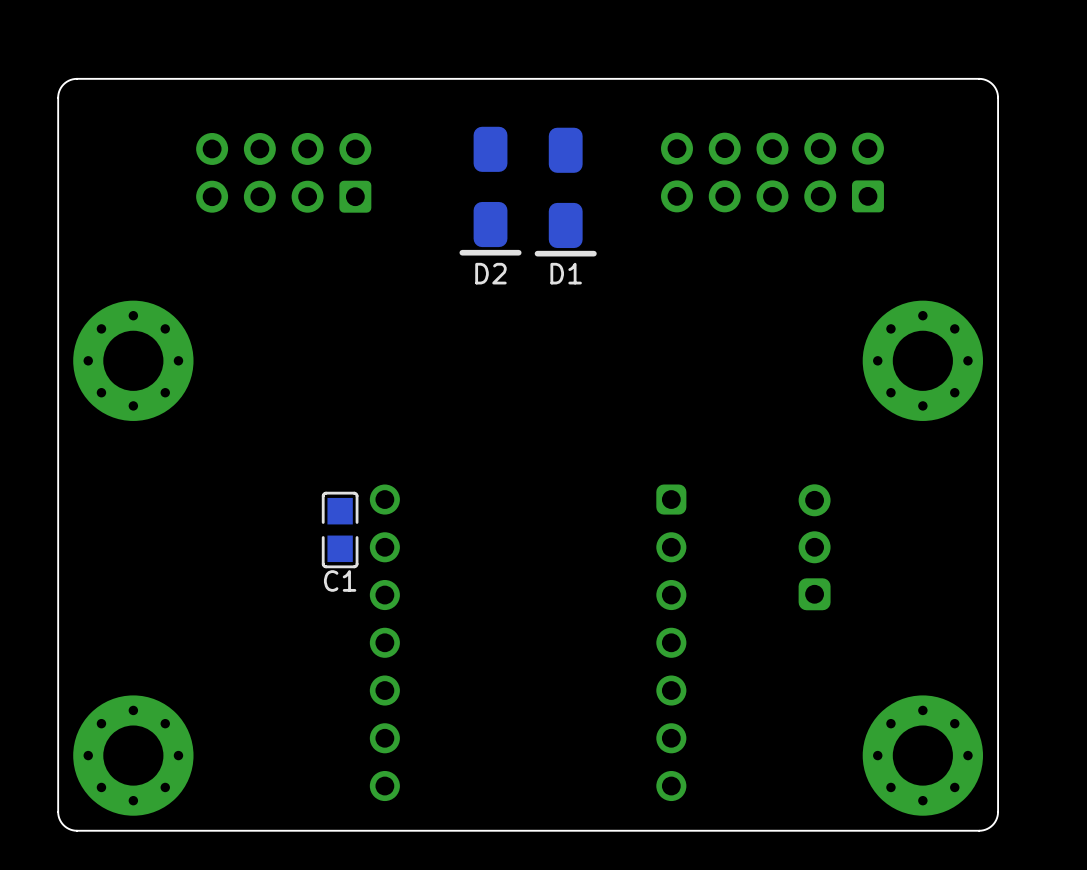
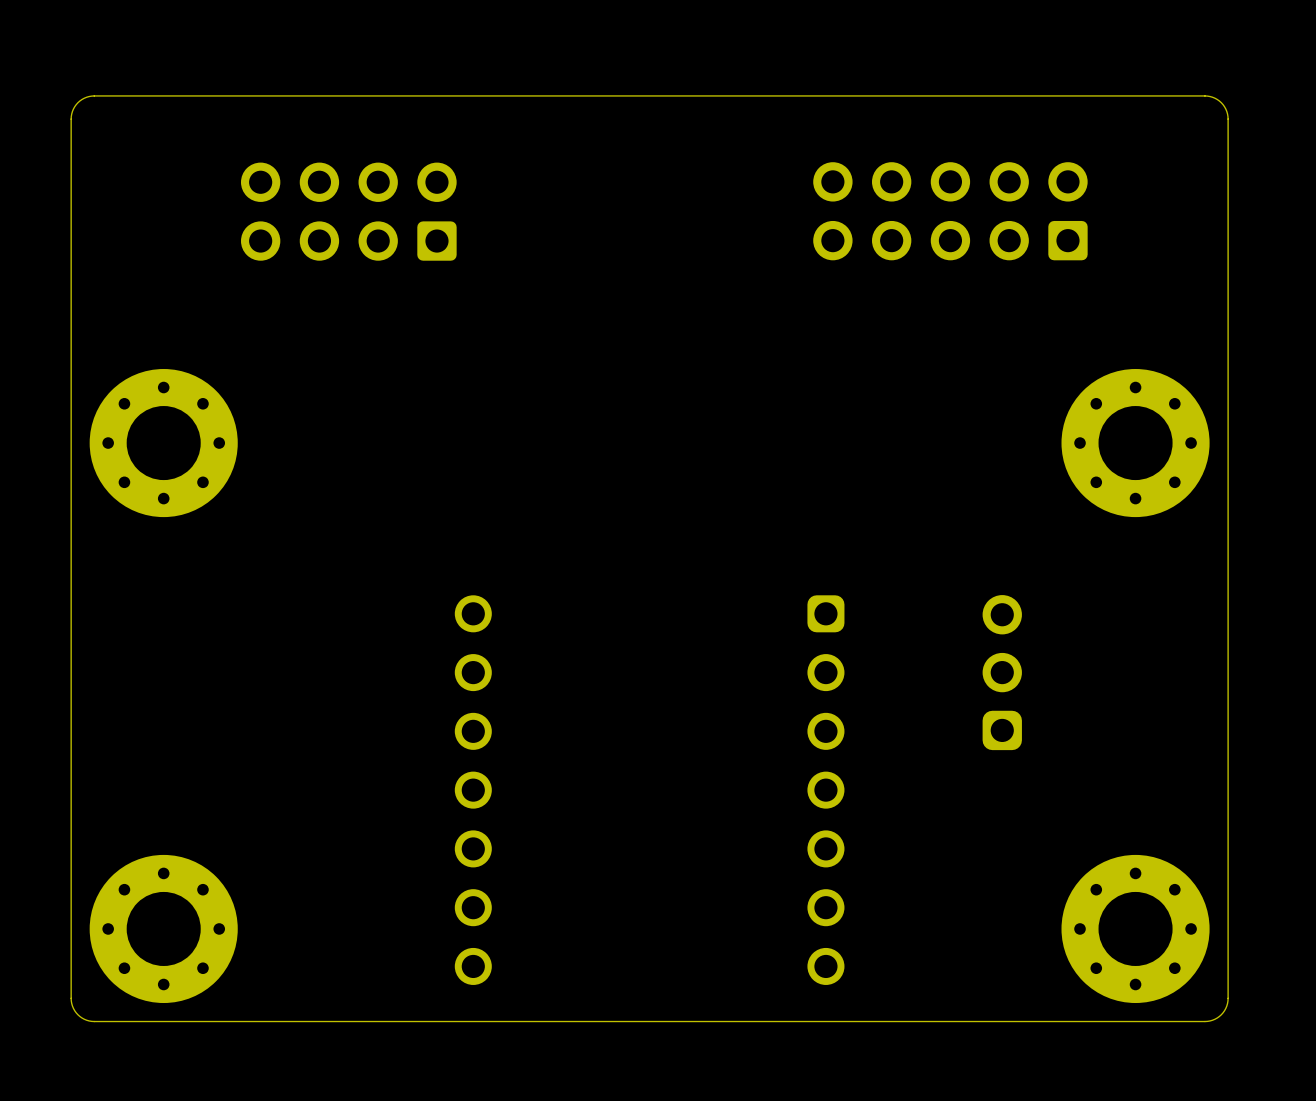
D2: (490, 191) -> none
D1: (565, 192) -> none
C1: (340, 529) -> none

